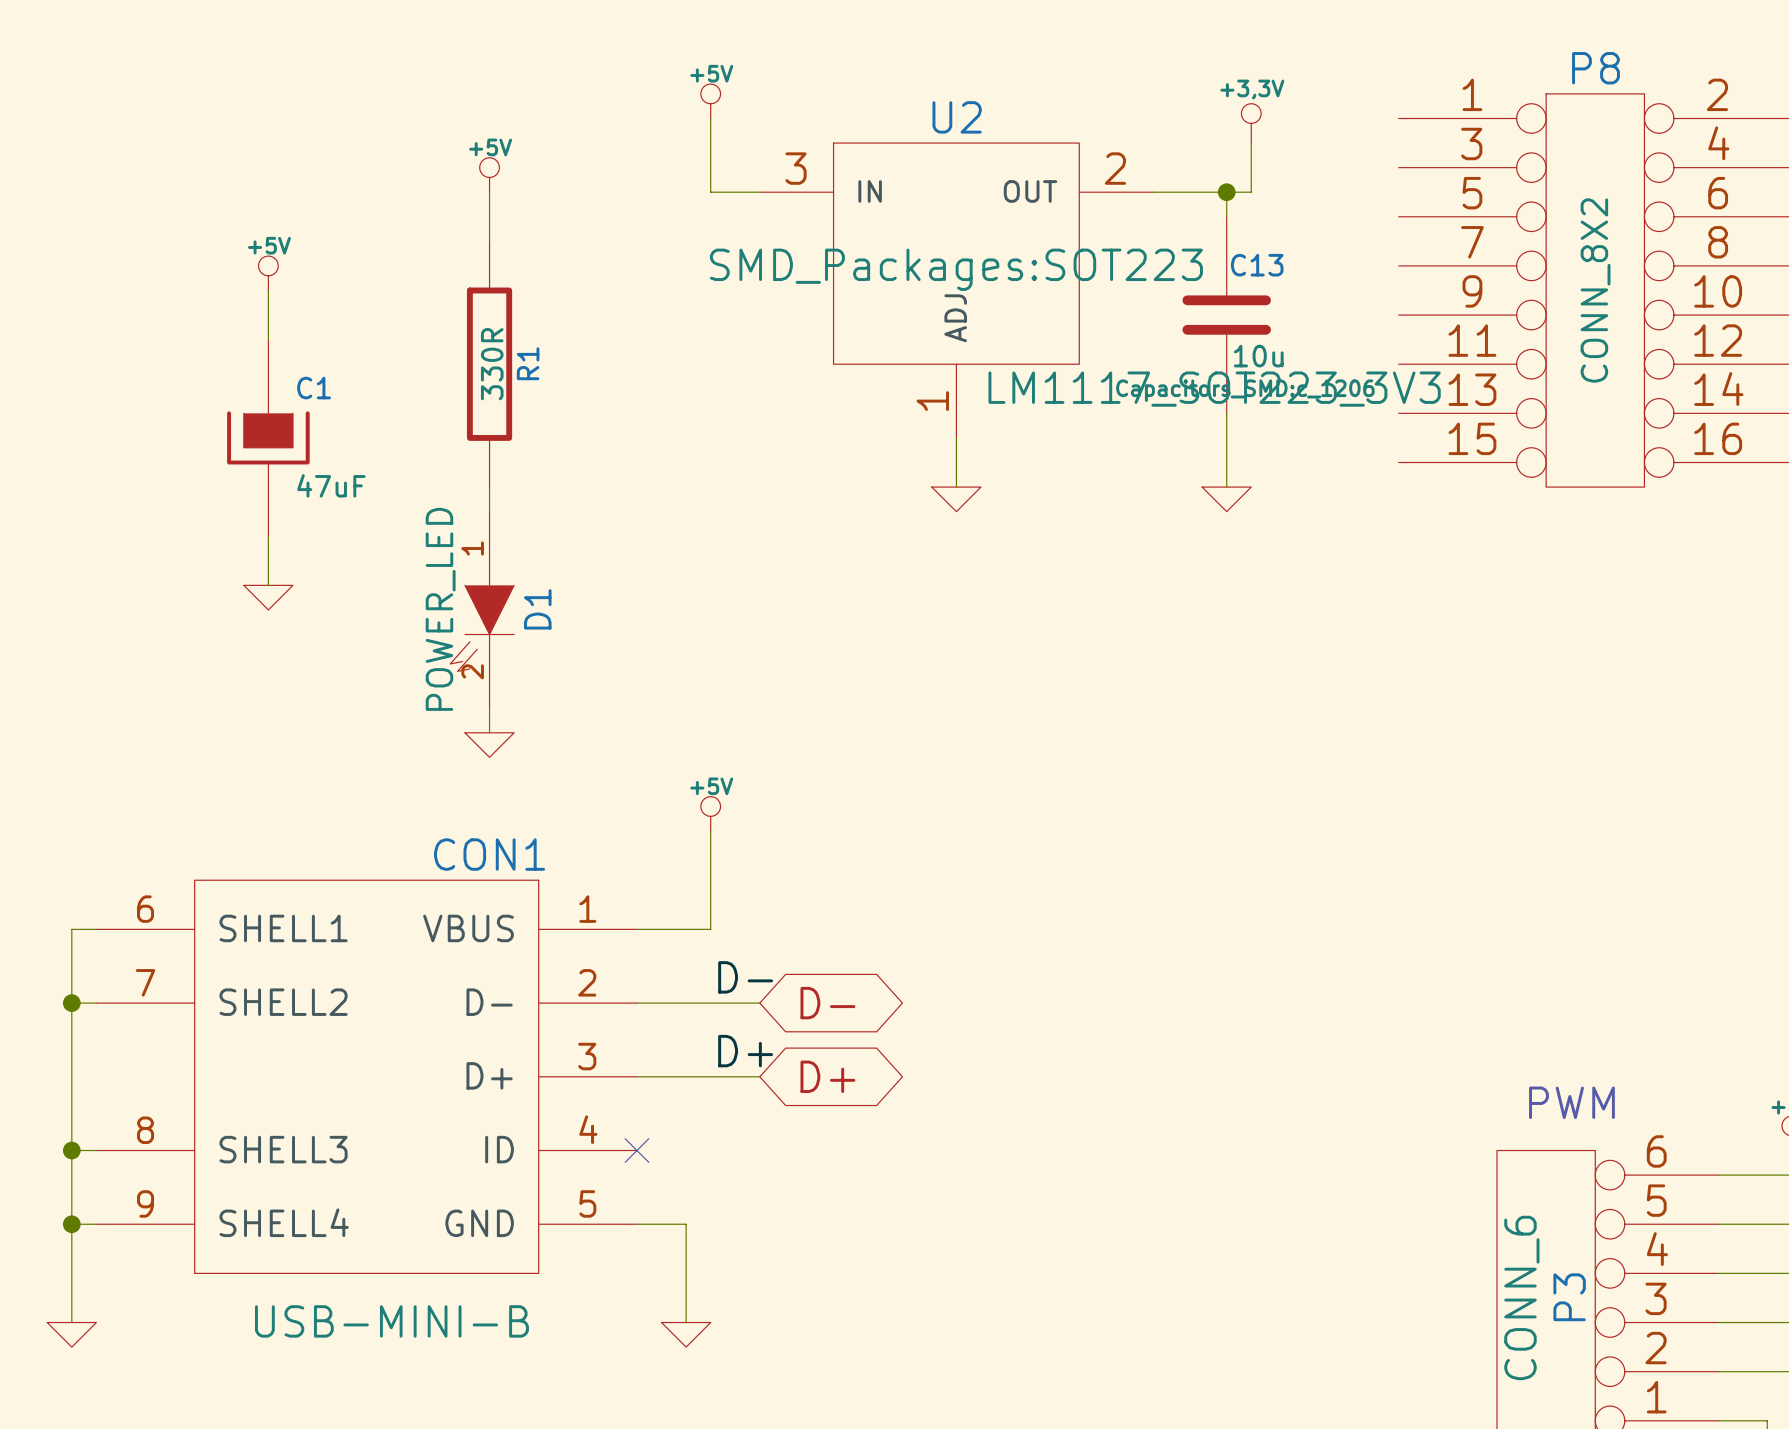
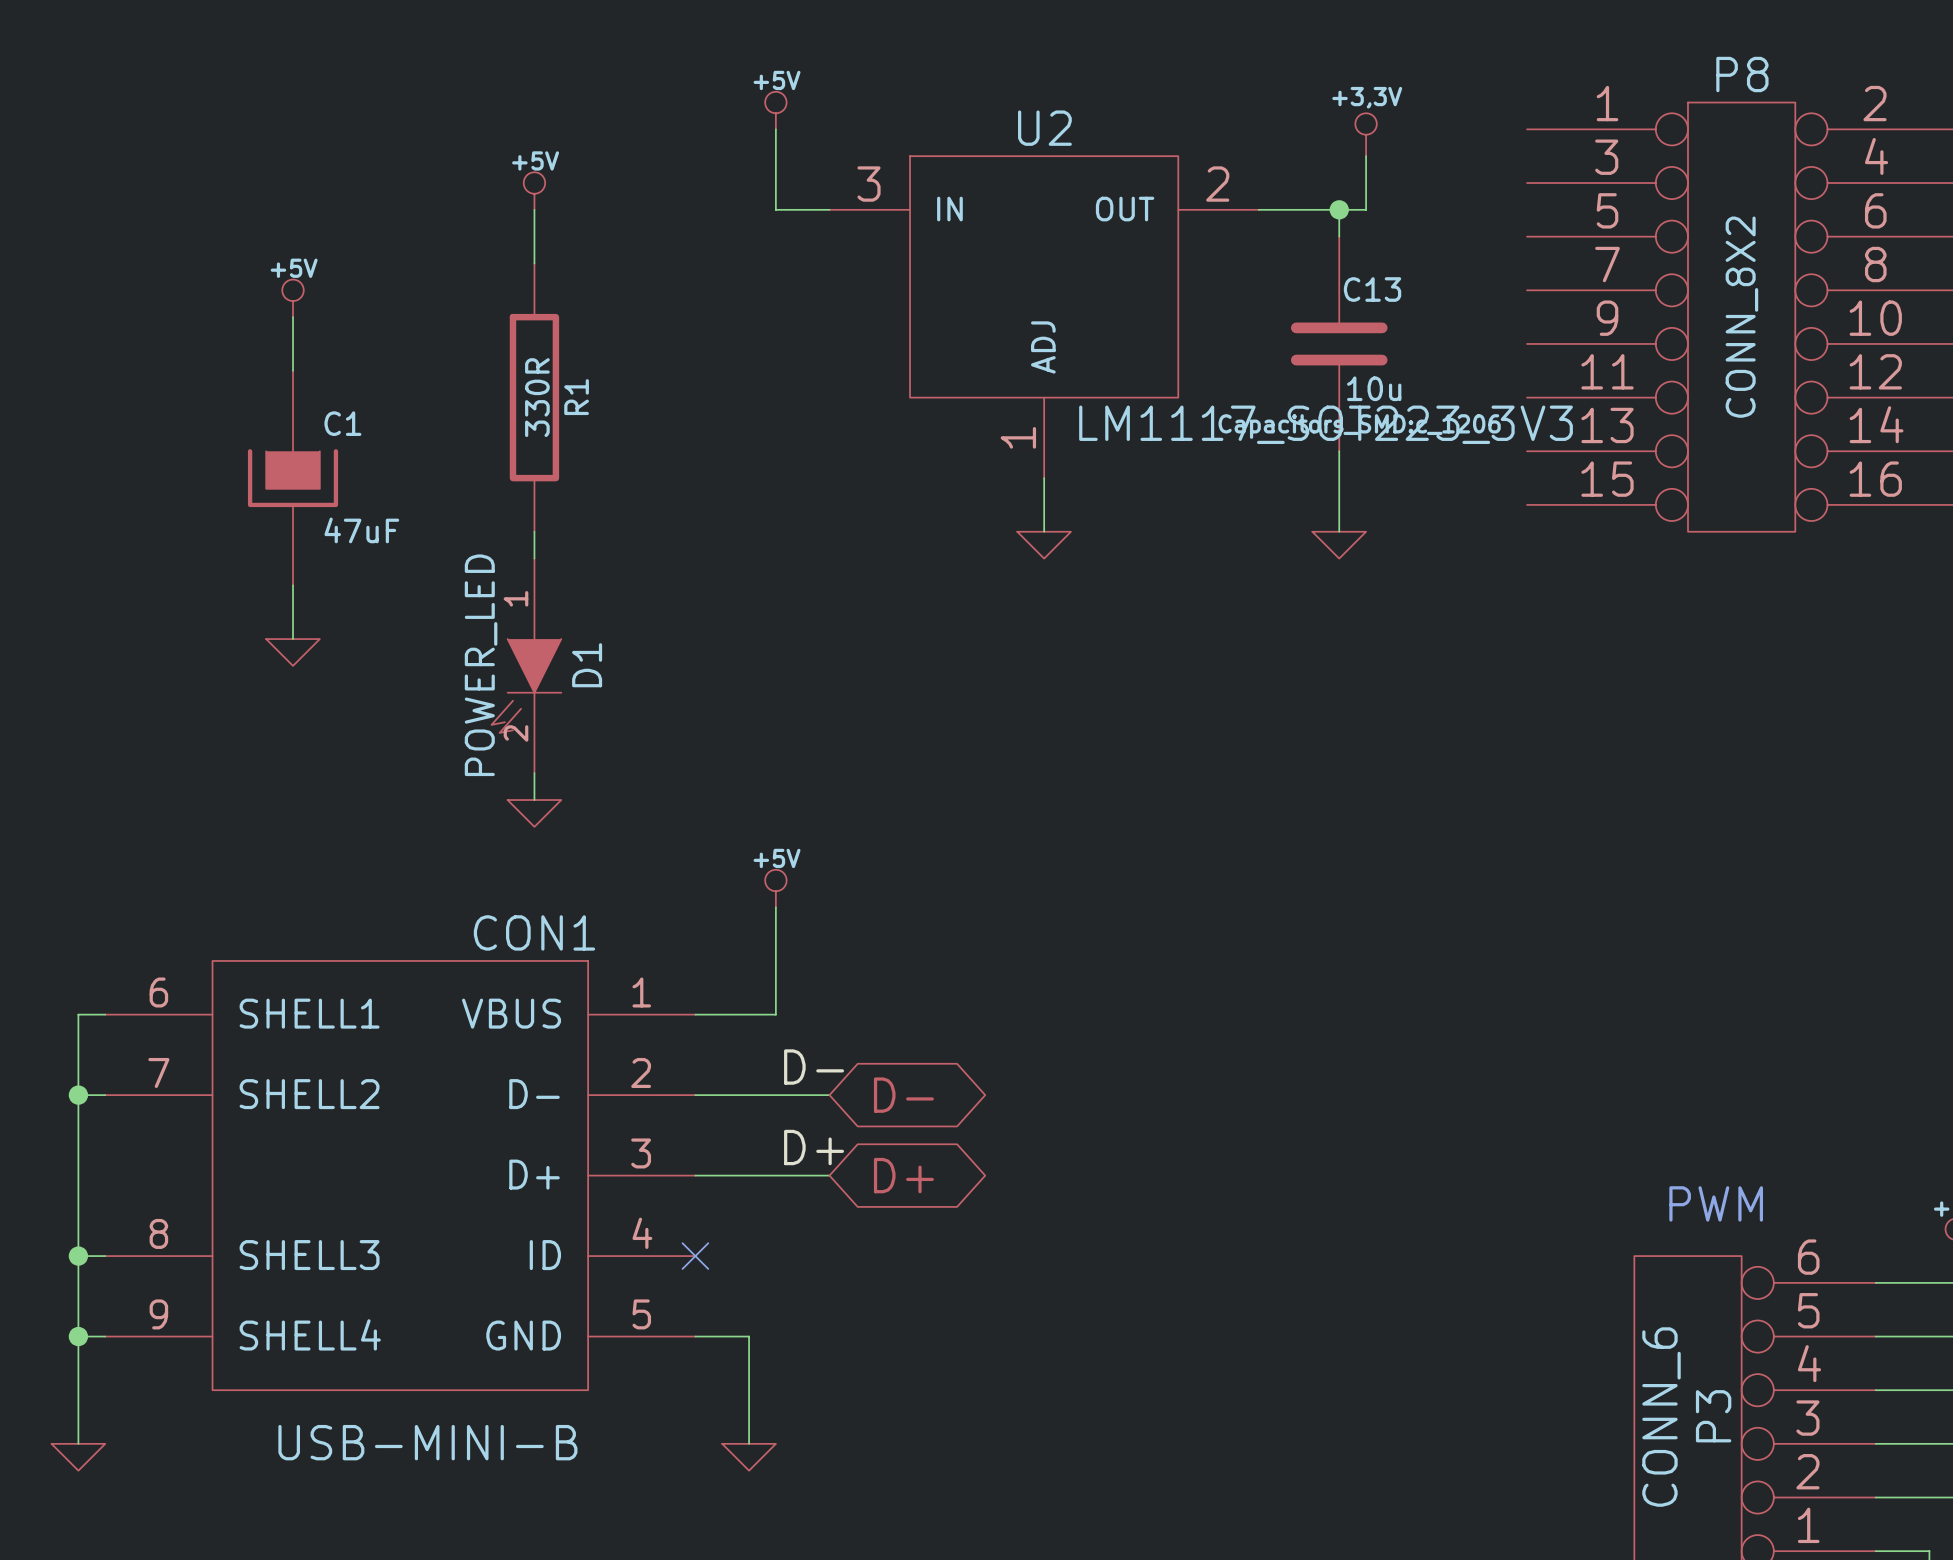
U2 text: SMD_Packages:SOT223 (956, 269) -> none

